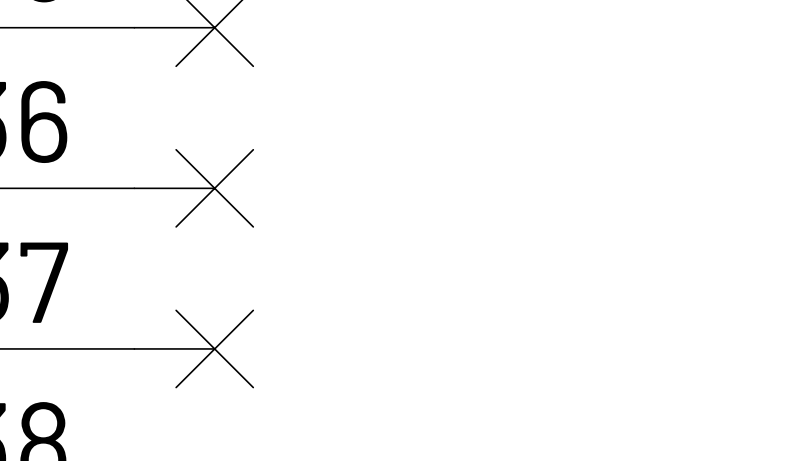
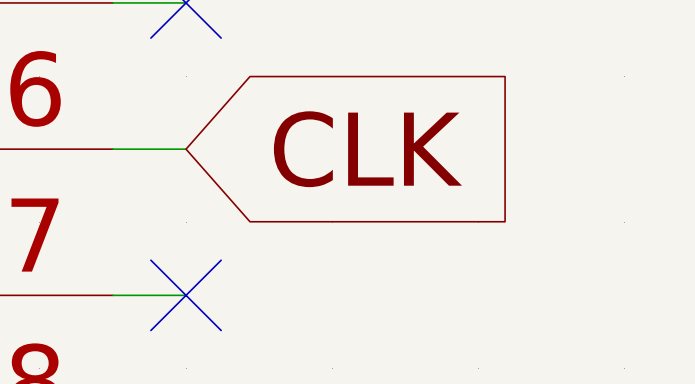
no-connect mark: (214, 188) -> none
global label: none -> CLK (367, 149)

